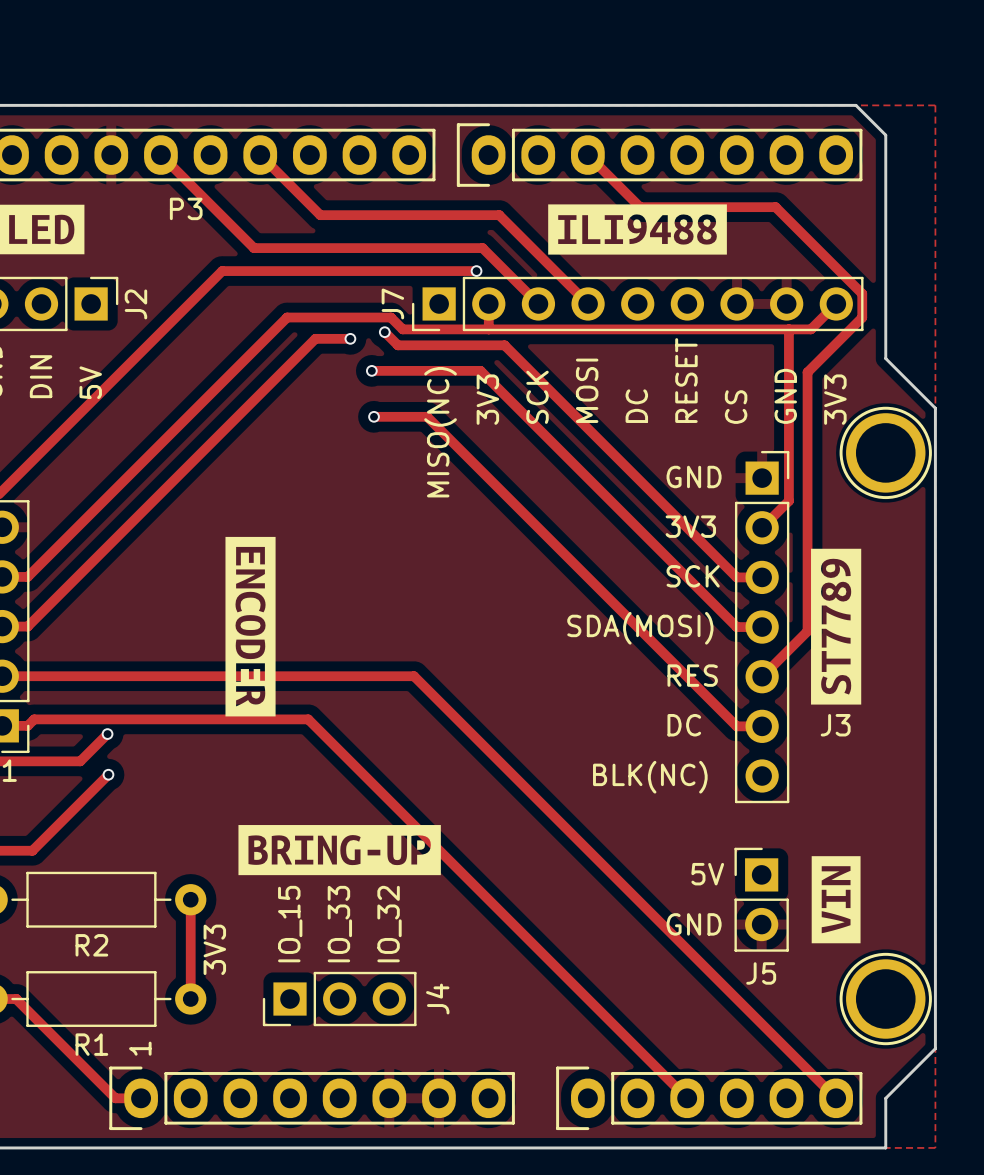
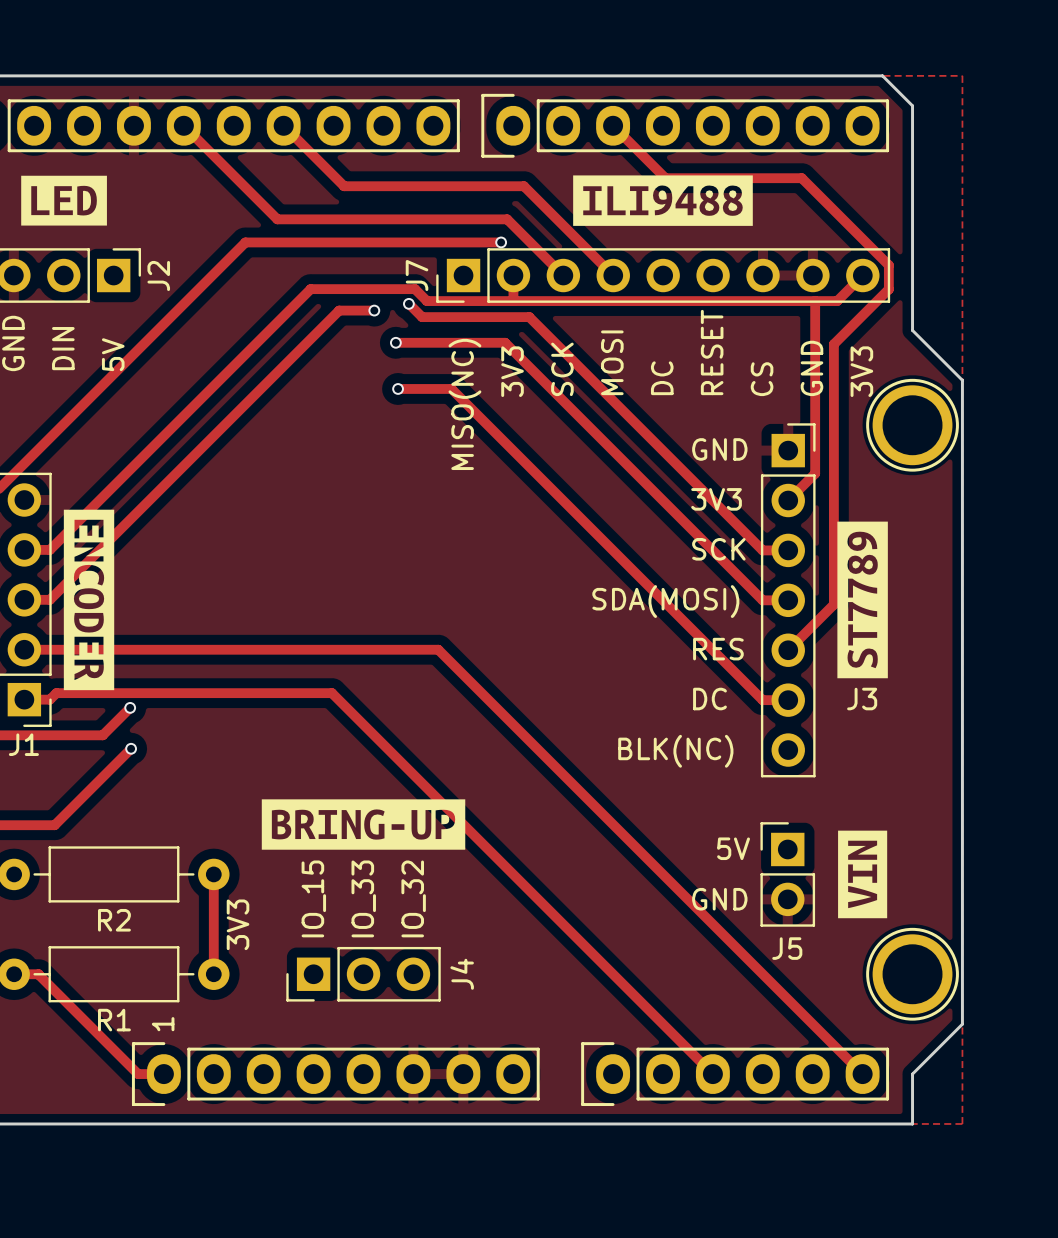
P3 name: P3 (186, 208) -> none
drawing position: (250, 626) -> (89, 599)

